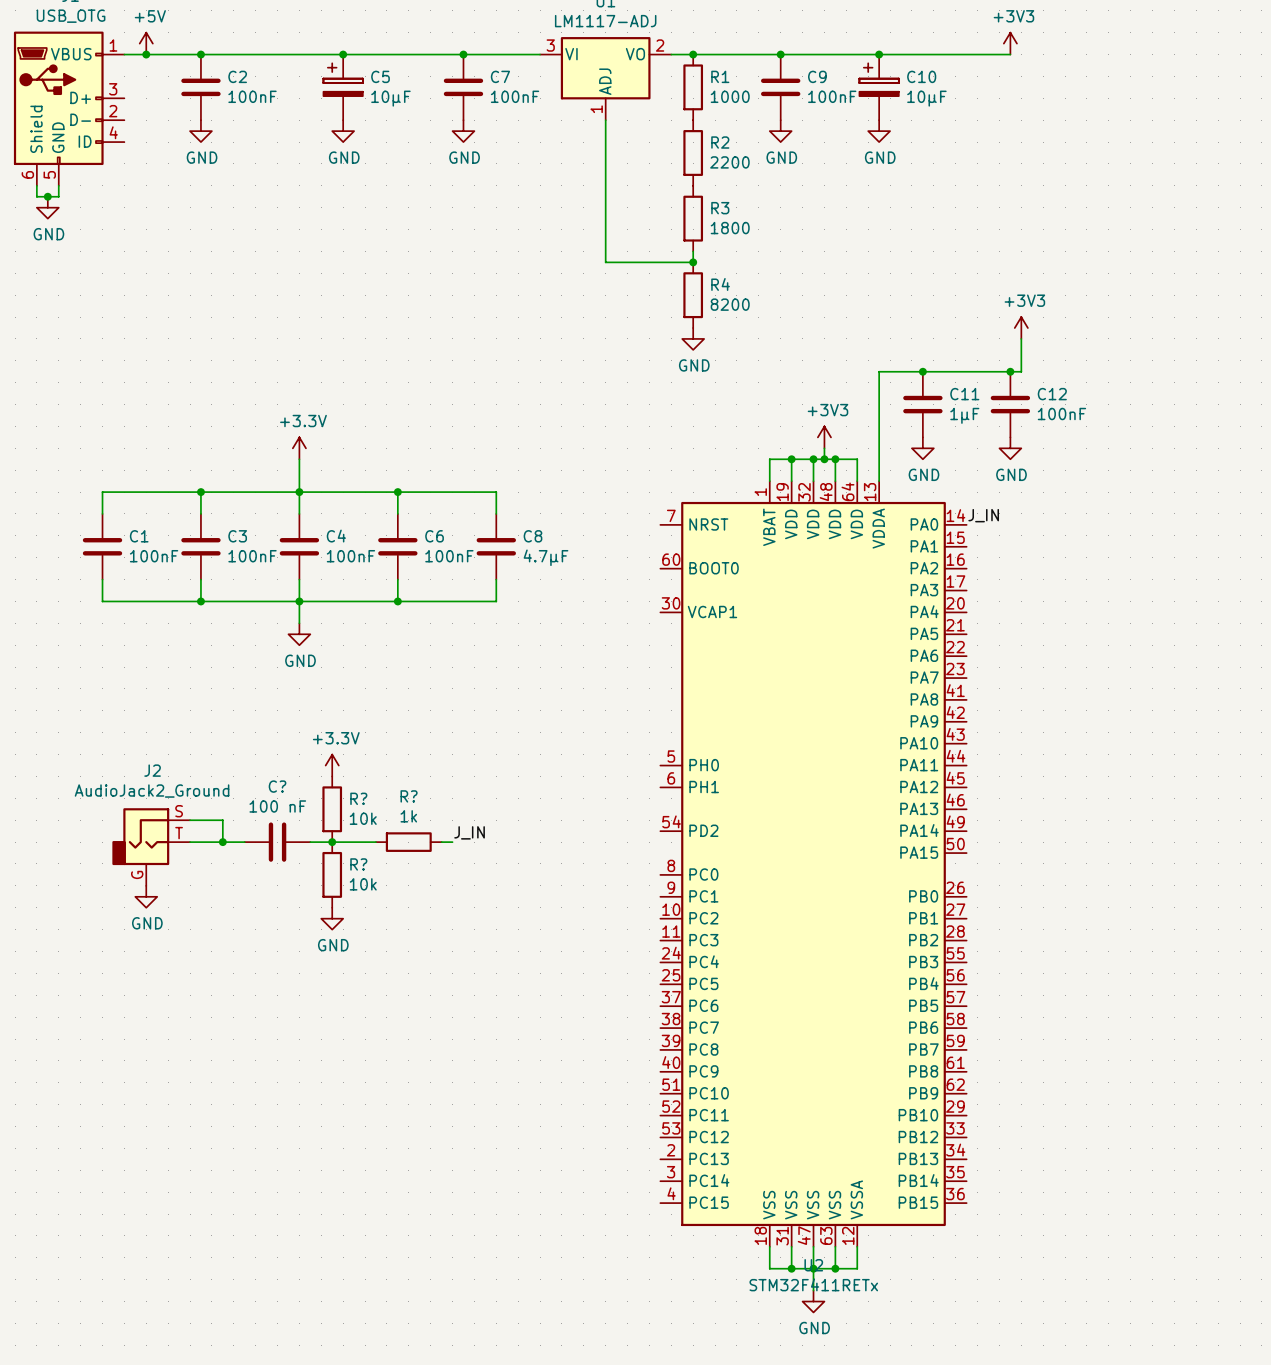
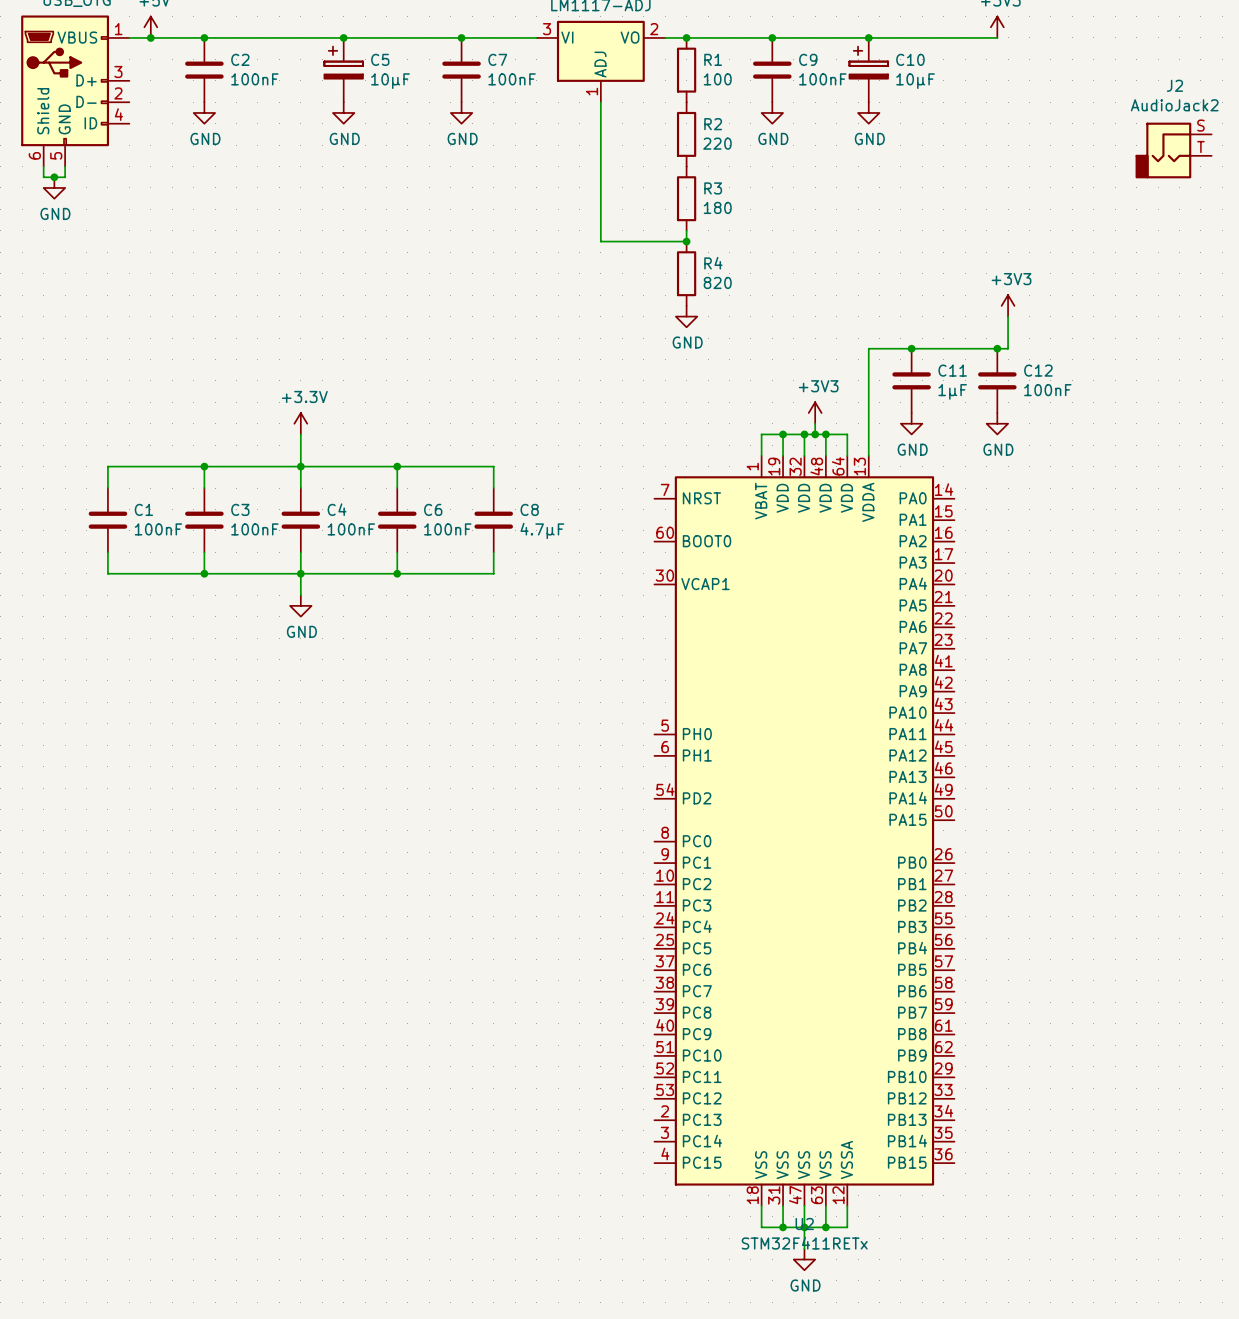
R1 value: 1000 (730, 96) -> 100 (717, 79)
R2 value: 2200 (729, 162) -> 220 (717, 143)
R3 value: 1800 (730, 228) -> 180 (717, 207)
R4 value: 8200 (730, 304) -> 820 (717, 282)
label: J_IN (983, 515) -> none
power symbol: +3.3V (332, 765) -> none
J2 value: AudioJack2_Ground (152, 791) -> AudioJack2 (1174, 105)
J2 symbol: [112, 808, 191, 886] -> [1135, 122, 1212, 179]
R?: 10k (332, 809) -> none
wire: (190, 820) (222, 820) (222, 842) -> none
label: J_IN (469, 832) -> none
wire: (190, 842) (244, 842) -> none
junction: (222, 842) -> none
C?: 100 nF (277, 842) -> none
wire: (310, 842) (375, 842) -> none
junction: (332, 842) -> none
R?: 1k (408, 842) -> none
wire: (441, 842) (452, 842) -> none
R?: 10k (332, 874) -> none
power symbol: GND (146, 896) -> none
power symbol: GND (332, 918) -> none

